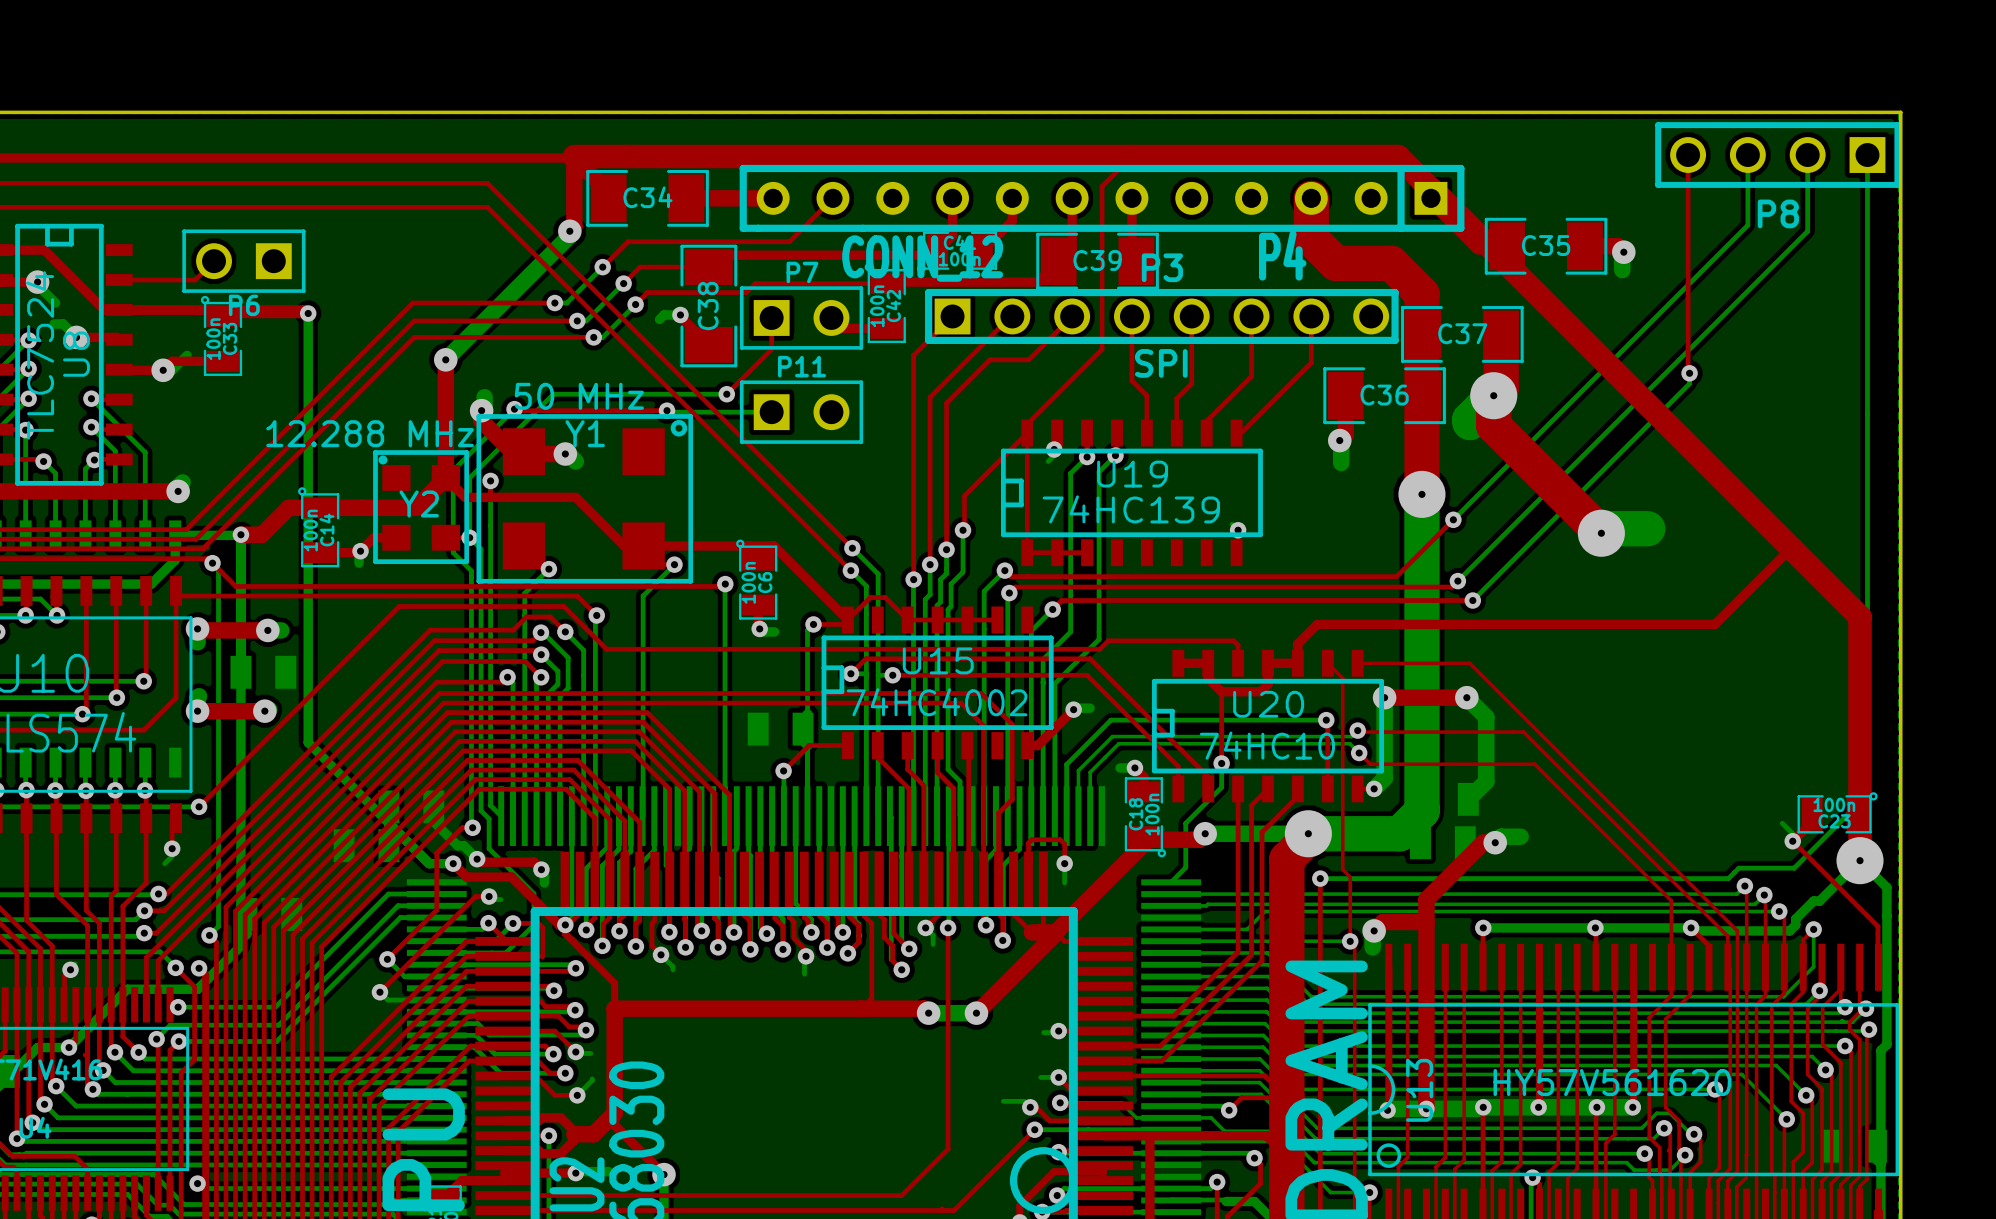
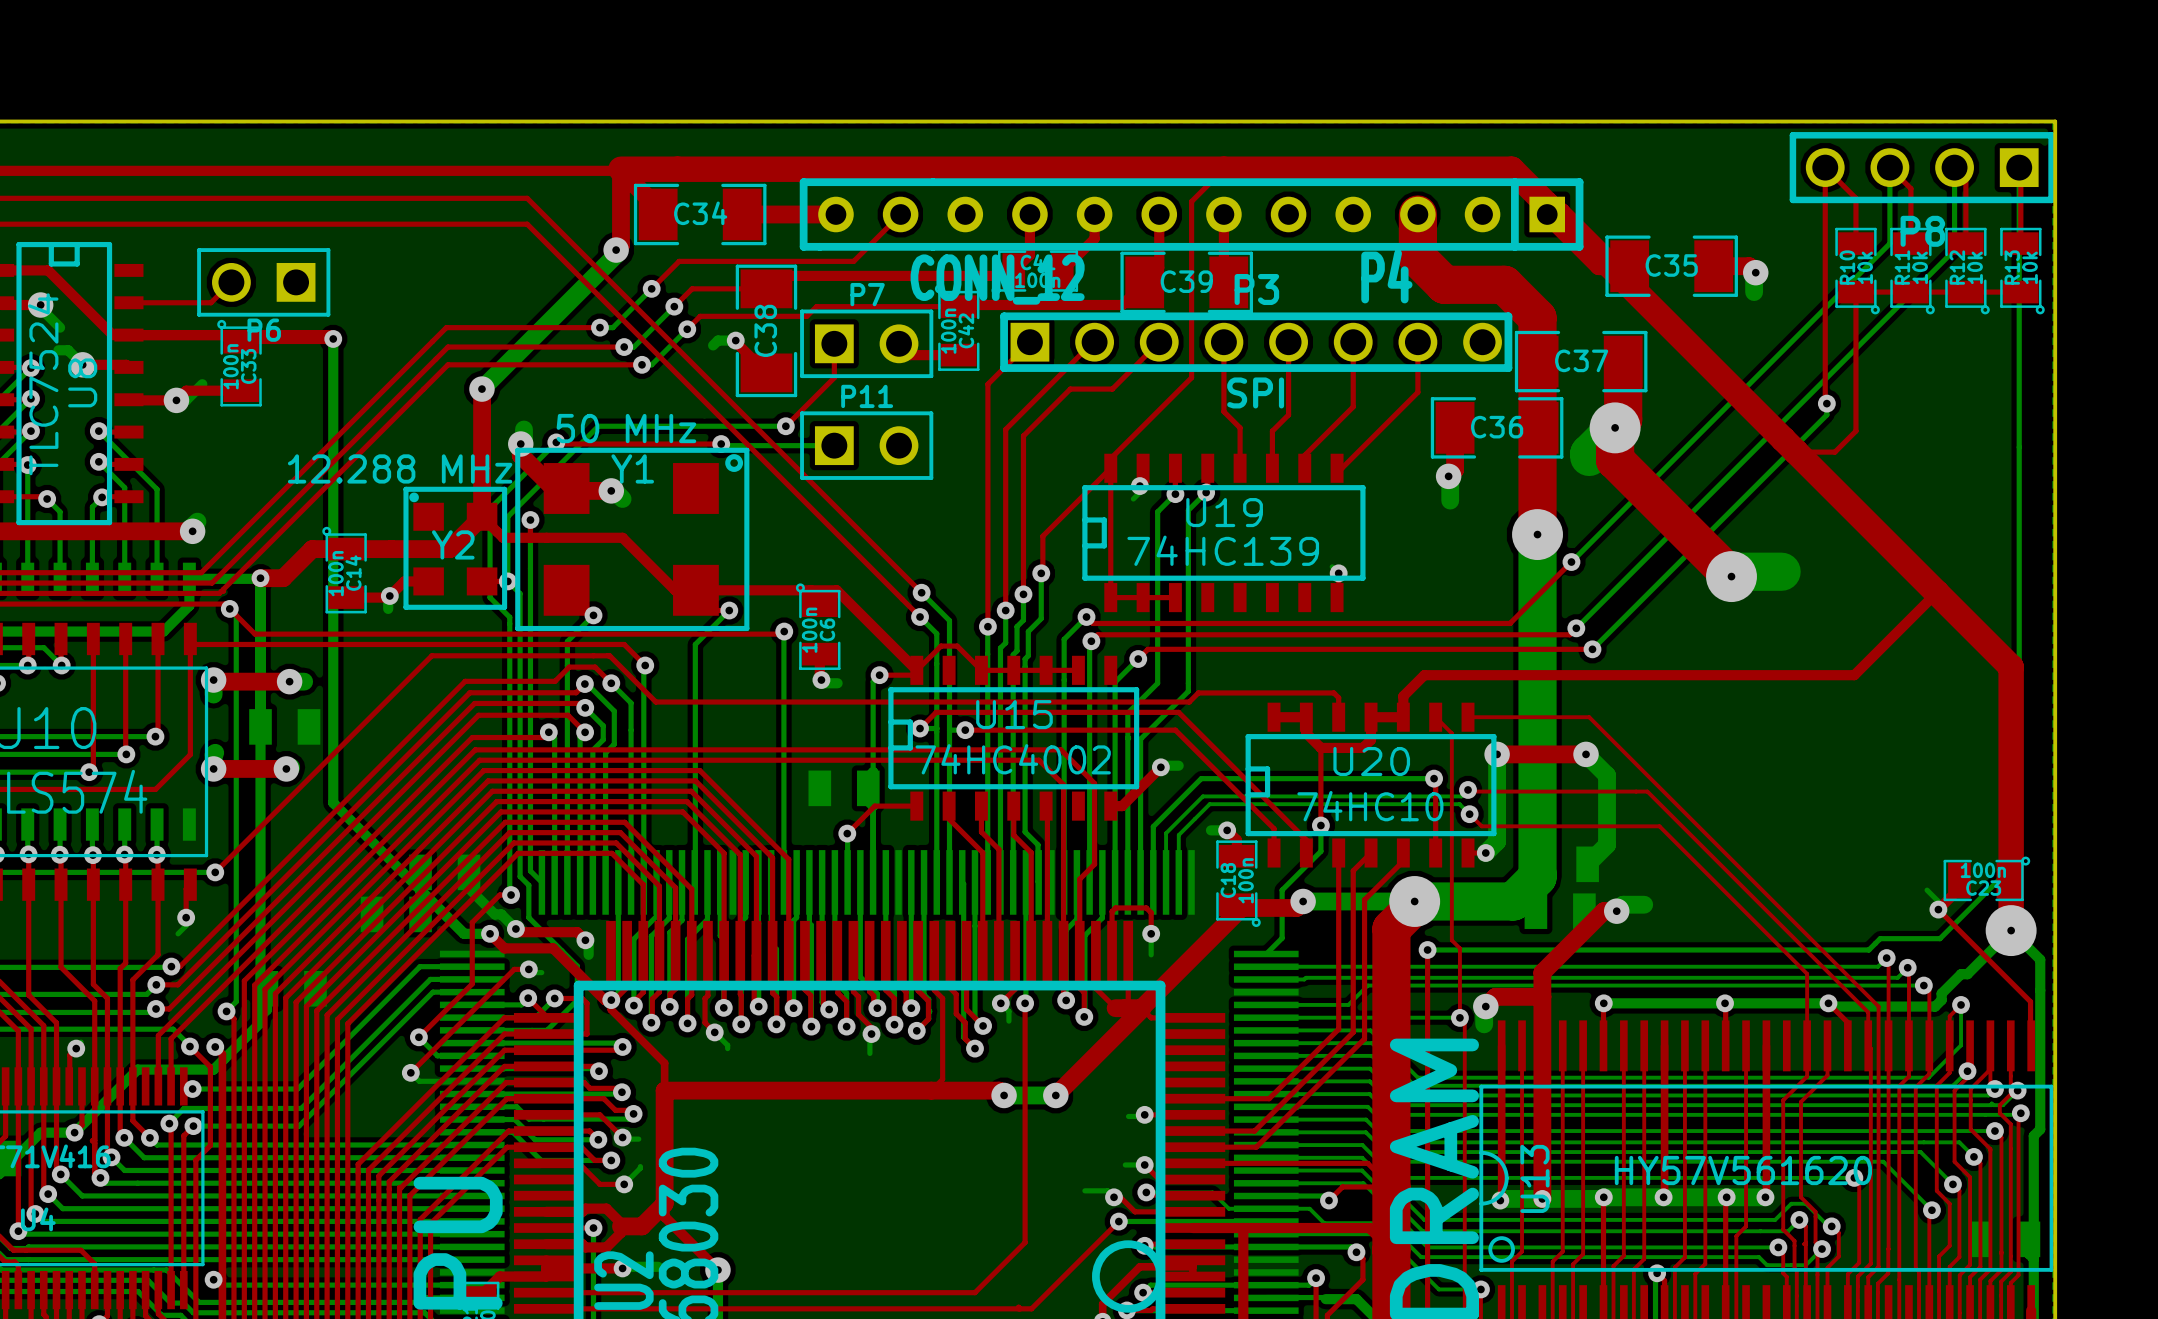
top track: none -> (1825, 167) (1855, 198) (1855, 243)
top track: none -> (1889, 167) (1910, 188) (1910, 243)
top track: none -> (1954, 167) (1965, 178) (1965, 243)
top track: none -> (2019, 167) (2020, 169) (2020, 243)
R10: none -> 10k (1857, 271)
R11: none -> 10k (1912, 271)
R12: none -> 10k (1967, 271)
R13: none -> 10k (2022, 271)
top track: none -> (2020, 292) (1855, 292) (1855, 431) (1834, 452) (1796, 452)

